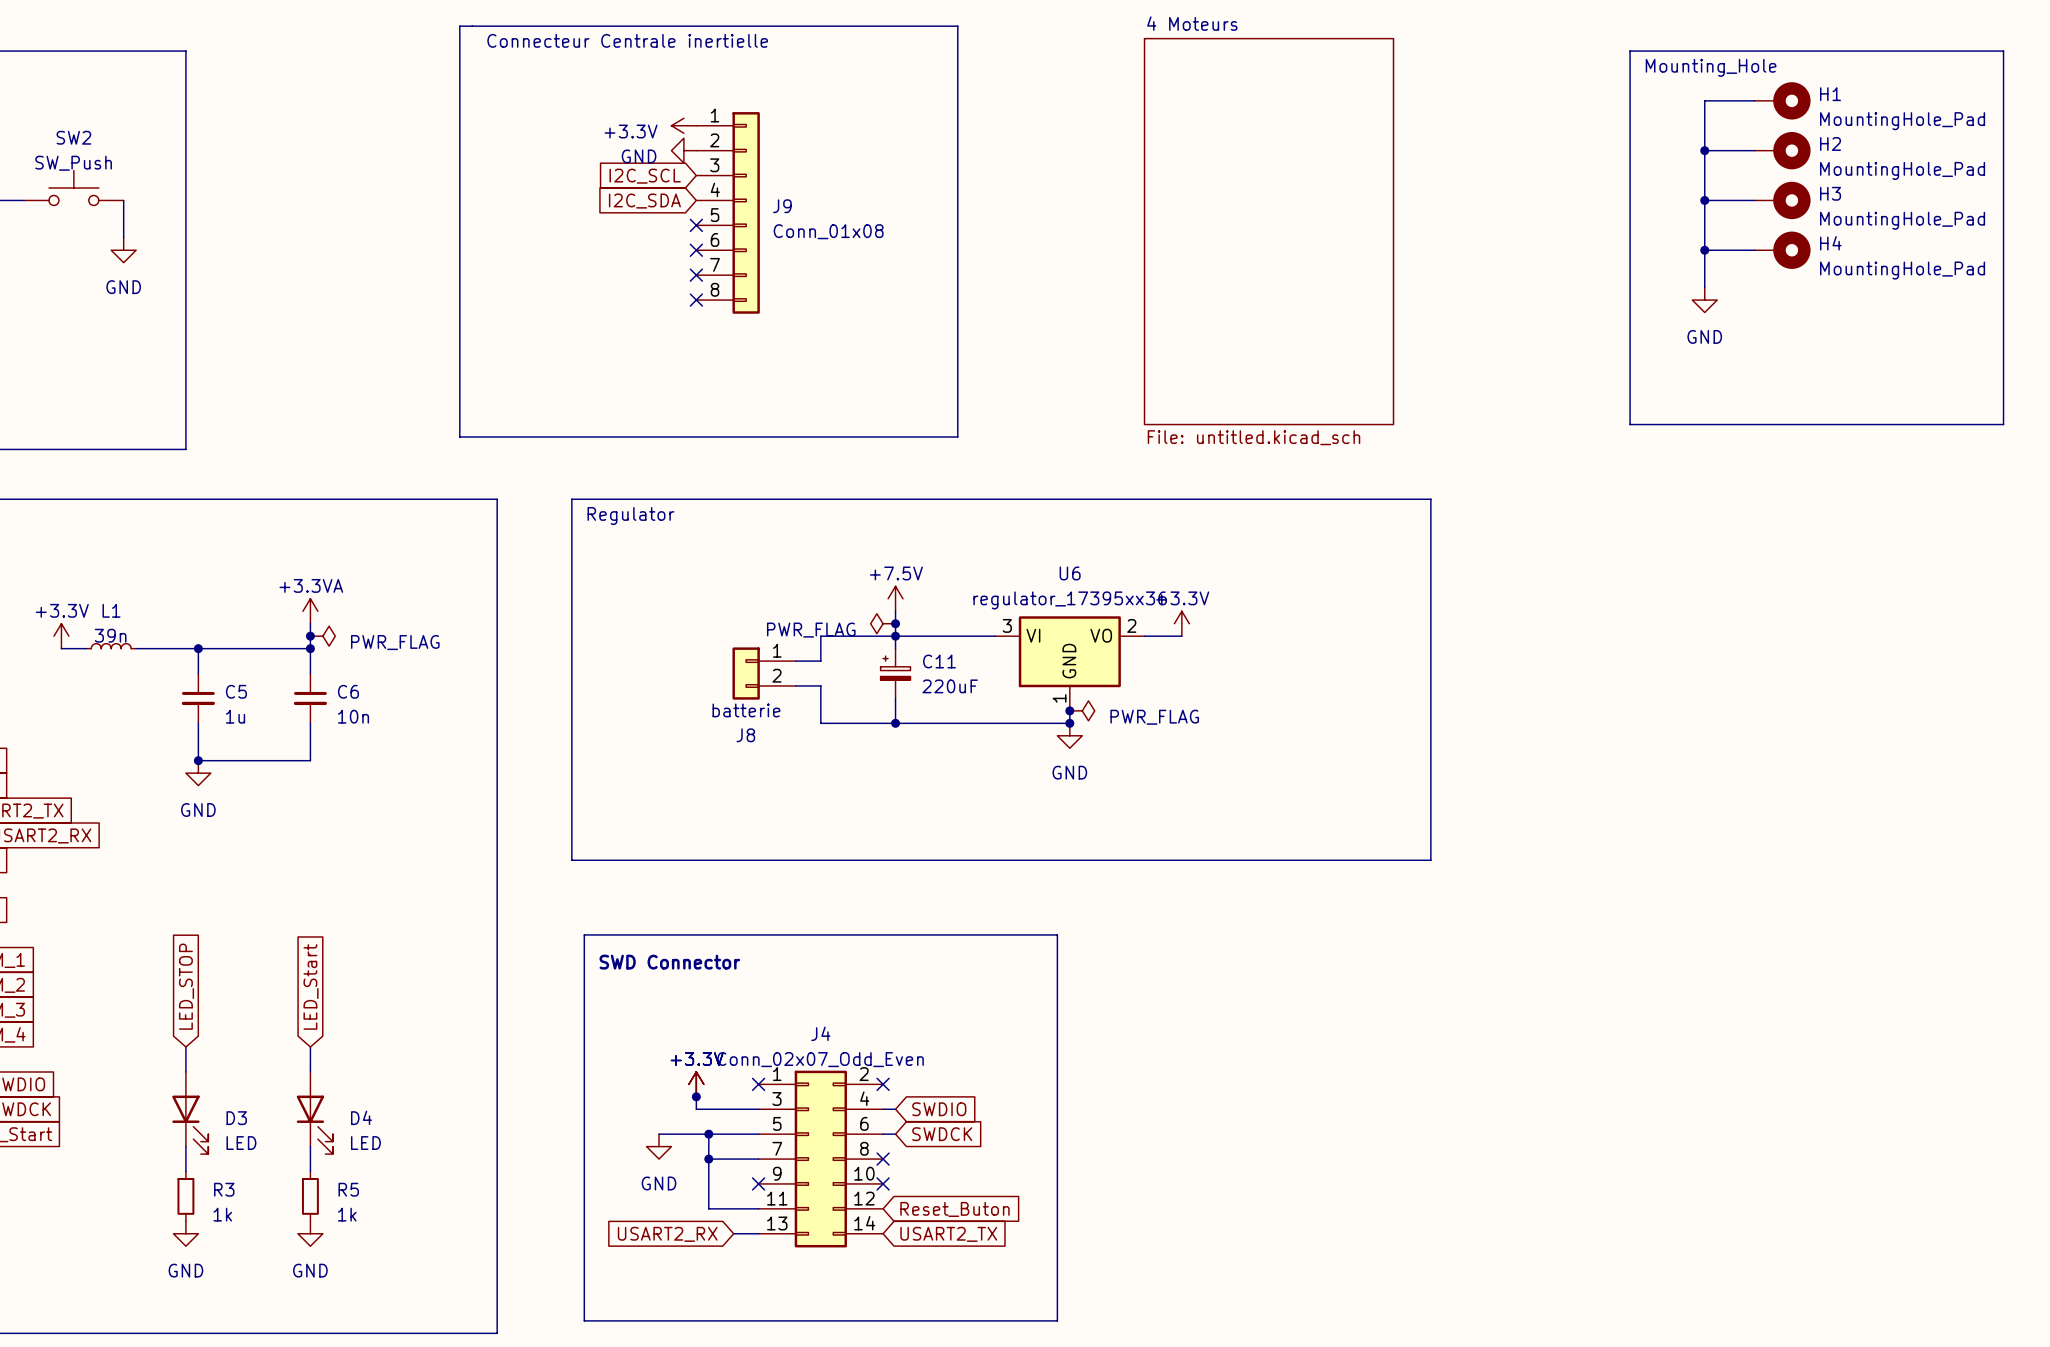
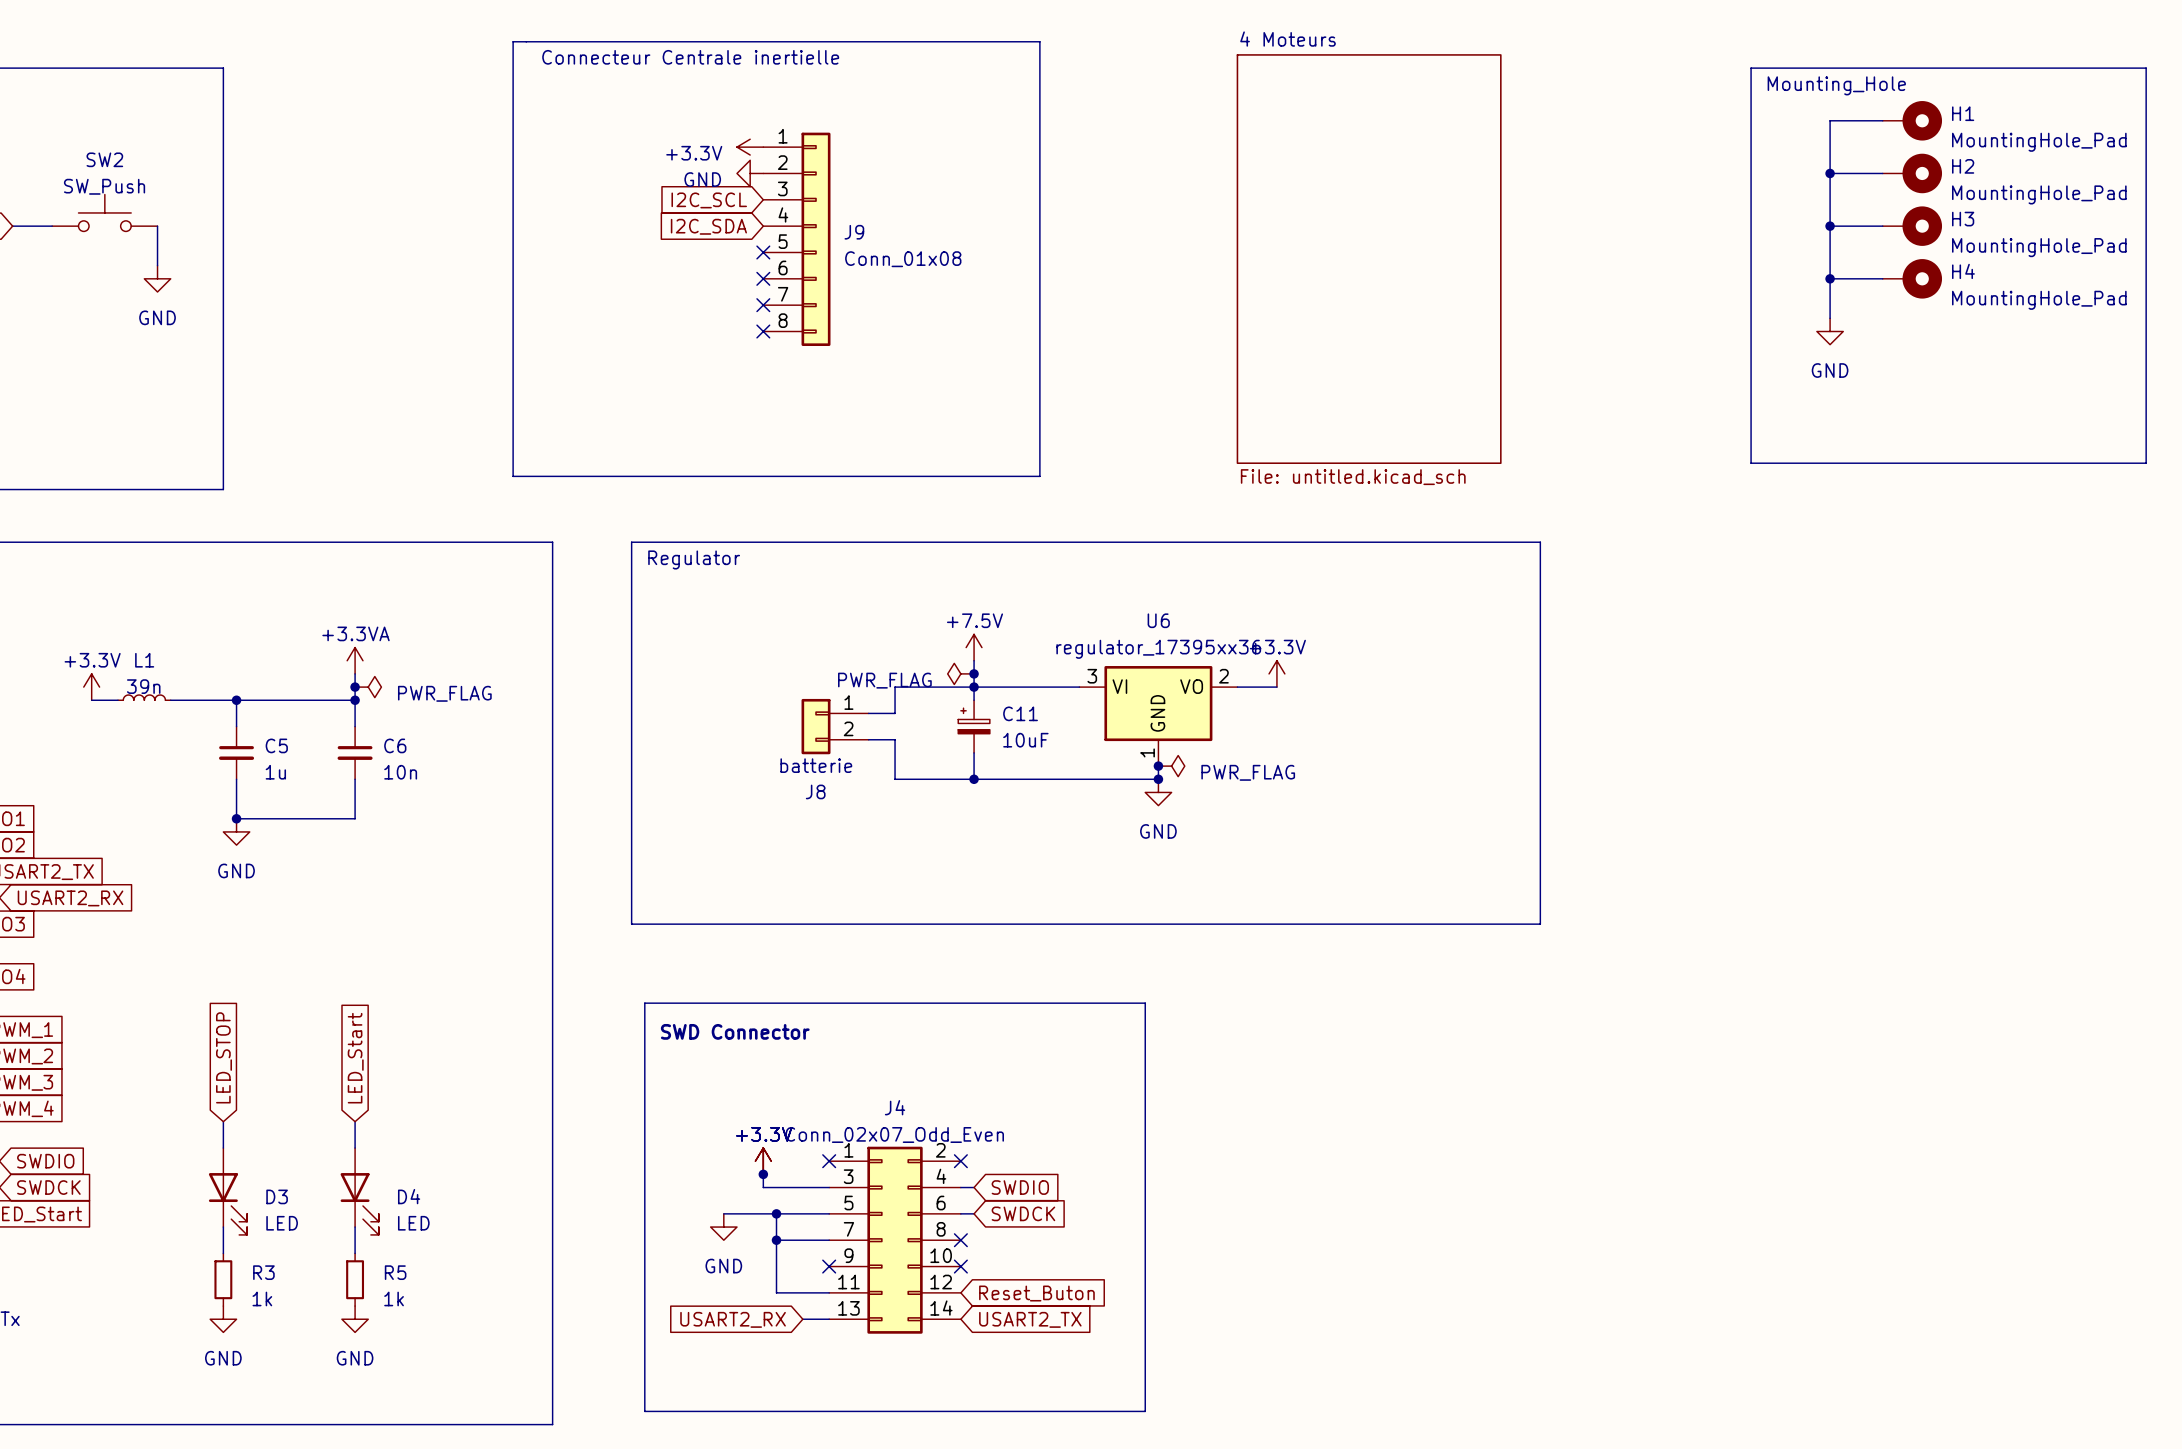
C11 value: 220uF (950, 686) -> 10uF (1025, 740)

